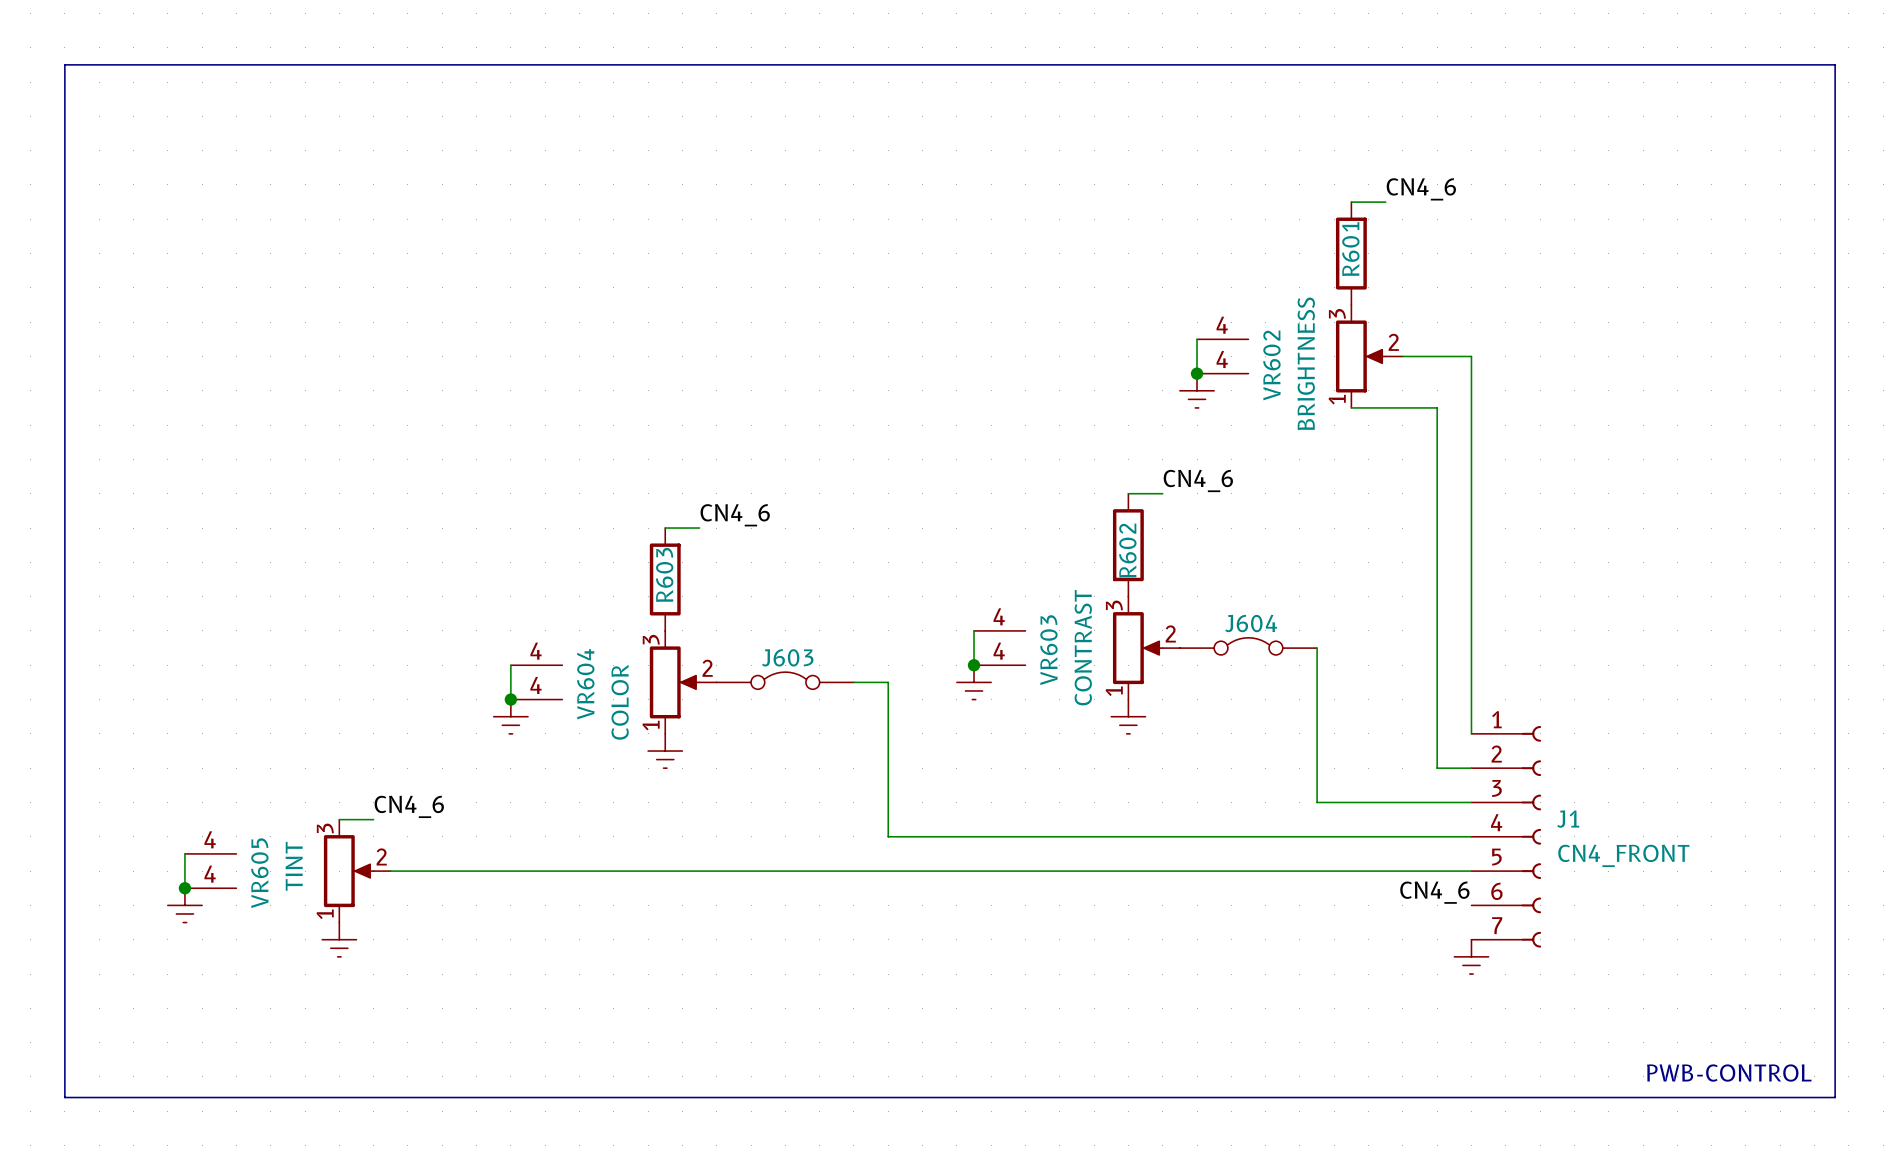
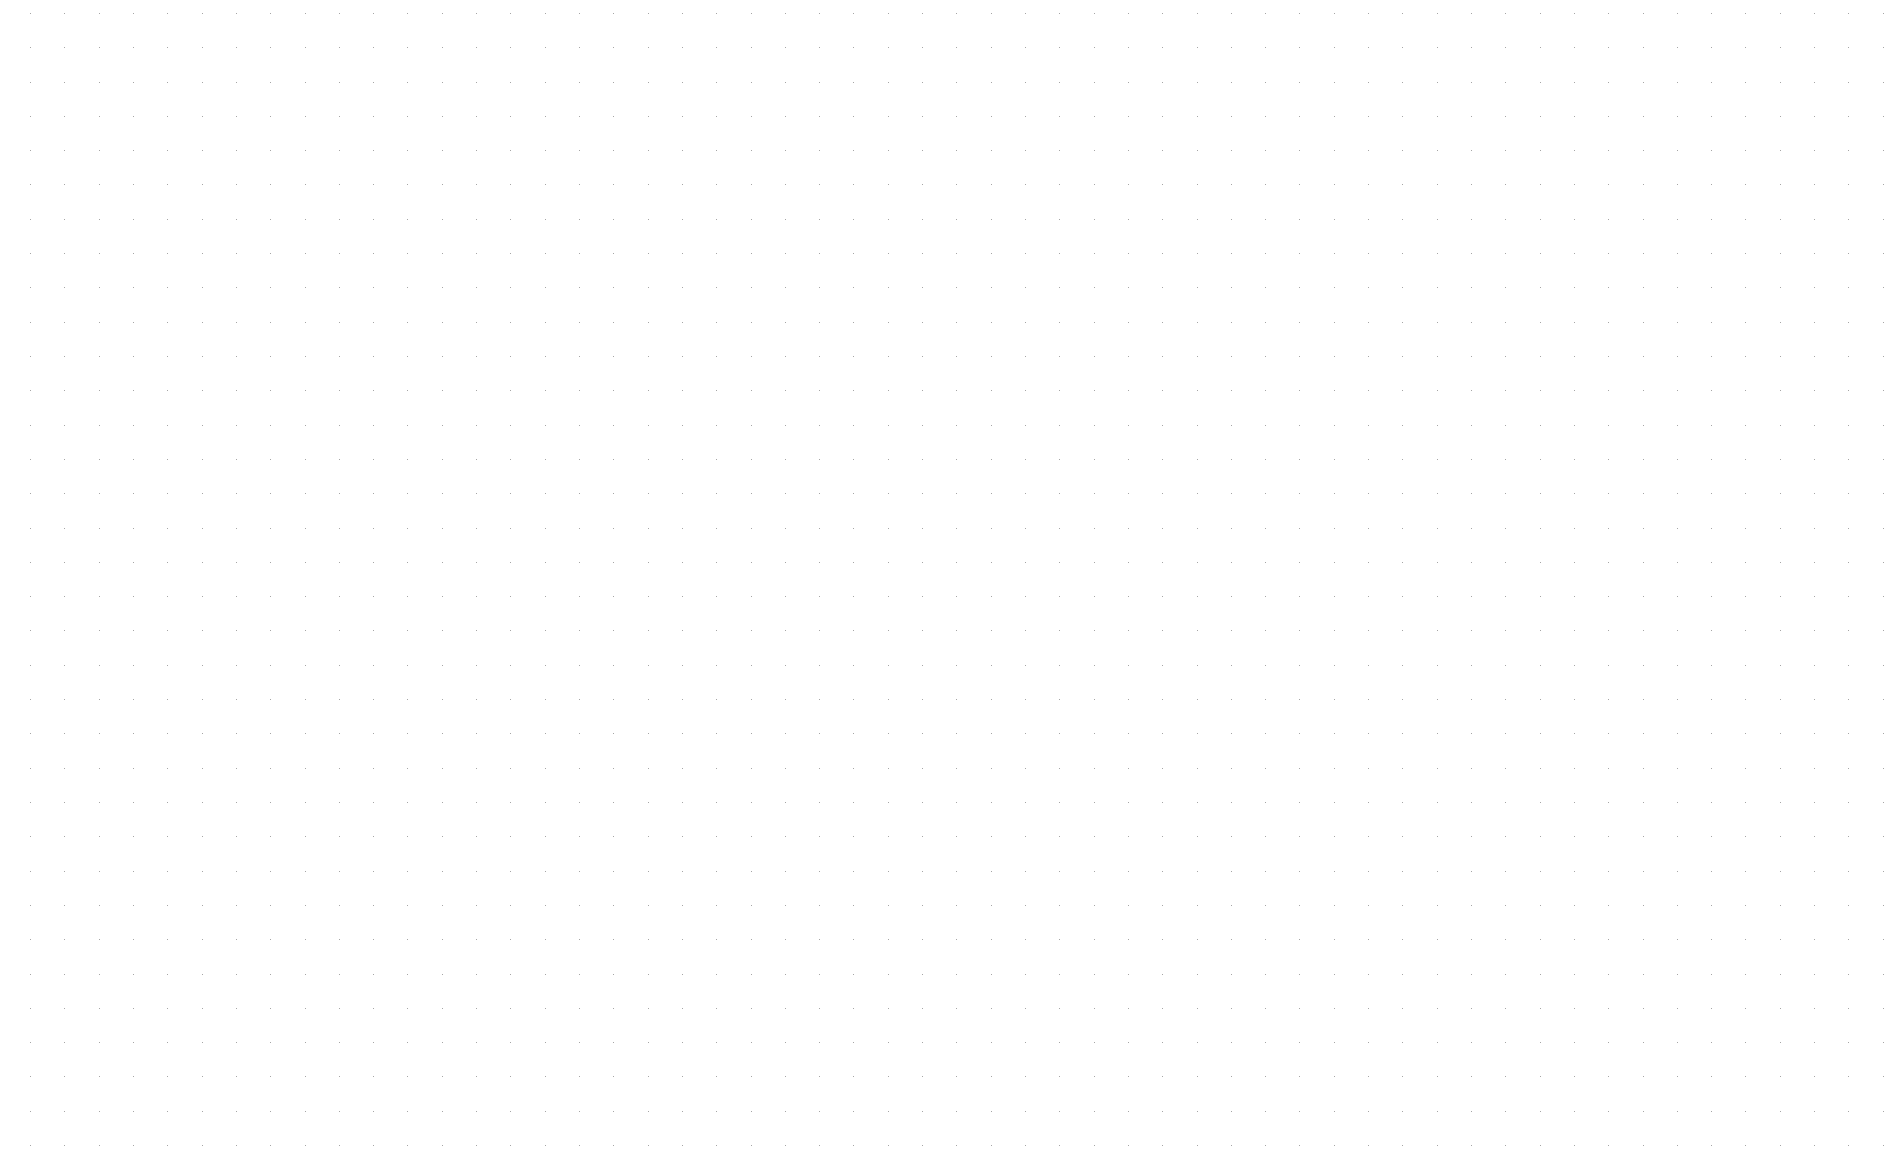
line: (64, 64) (1835, 64) (1835, 1097) (64, 1097) (64, 64) -> none
label: CN4_6 (1421, 189) -> none
wire: (1351, 202) (1385, 202) -> none
R601: (1351, 253) -> none
wire: (1197, 339) (1197, 373) -> none
VR602: BRIGHTNESS (1299, 356) -> none
wire: (1402, 356) (1471, 356) (1471, 733) -> none
junction: (1197, 373) -> none
power symbol: (1197, 390) -> none
wire: (1351, 407) (1437, 407) (1437, 768) (1471, 768) -> none
label: CN4_6 (1198, 480) -> none
wire: (1128, 493) (1162, 493) -> none
label: CN4_6 (735, 515) -> none
wire: (665, 528) (699, 528) -> none
R602: (1128, 545) -> none
R603: (665, 579) -> none
wire: (974, 630) (974, 665) -> none
J604: (1248, 646) -> none
VR603: CONTRAST (1076, 648) -> none
wire: (1317, 648) (1317, 802) (1471, 802) -> none
wire: (510, 665) (510, 699) -> none
junction: (974, 665) -> none
J603: (785, 680) -> none
VR604: COLOR (613, 682) -> none
wire: (853, 682) (888, 682) (888, 836) (1471, 836) -> none
power symbol: (974, 682) -> none
junction: (510, 699) -> none
power symbol: (510, 716) -> none
power symbol: (1128, 716) -> none
power symbol: (665, 751) -> none
label: CN4_6 (409, 806) -> none
wire: (339, 819) (373, 819) -> none
J1: CN4_FRONT (1506, 836) -> none
wire: (184, 853) (184, 888) -> none
VR605: TINT (287, 871) -> none
wire: (390, 871) (1471, 871) -> none
junction: (184, 888) -> none
label: CN4_6 (1434, 892) -> none
power symbol: (184, 905) -> none
power symbol: (339, 939) -> none
power symbol: (1471, 956) -> none
text: PWB-CONTROL (1729, 1073) -> none

